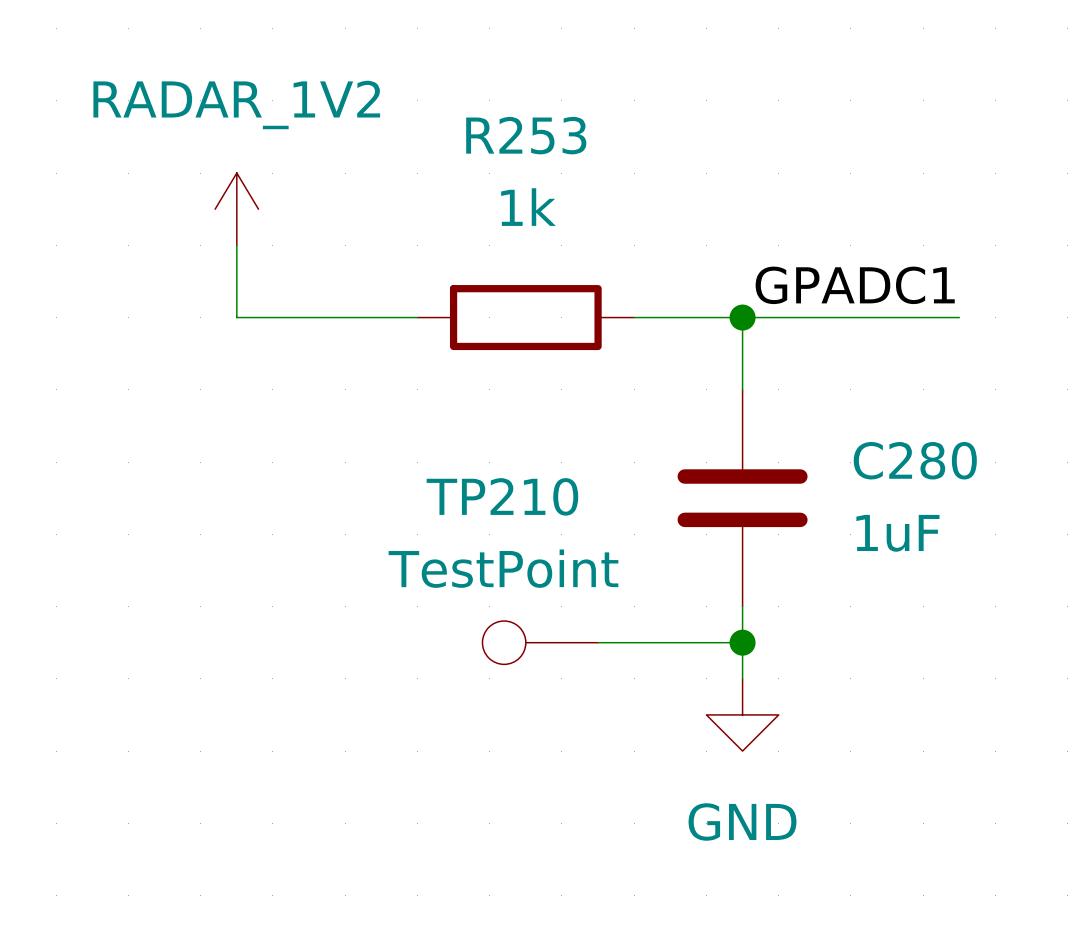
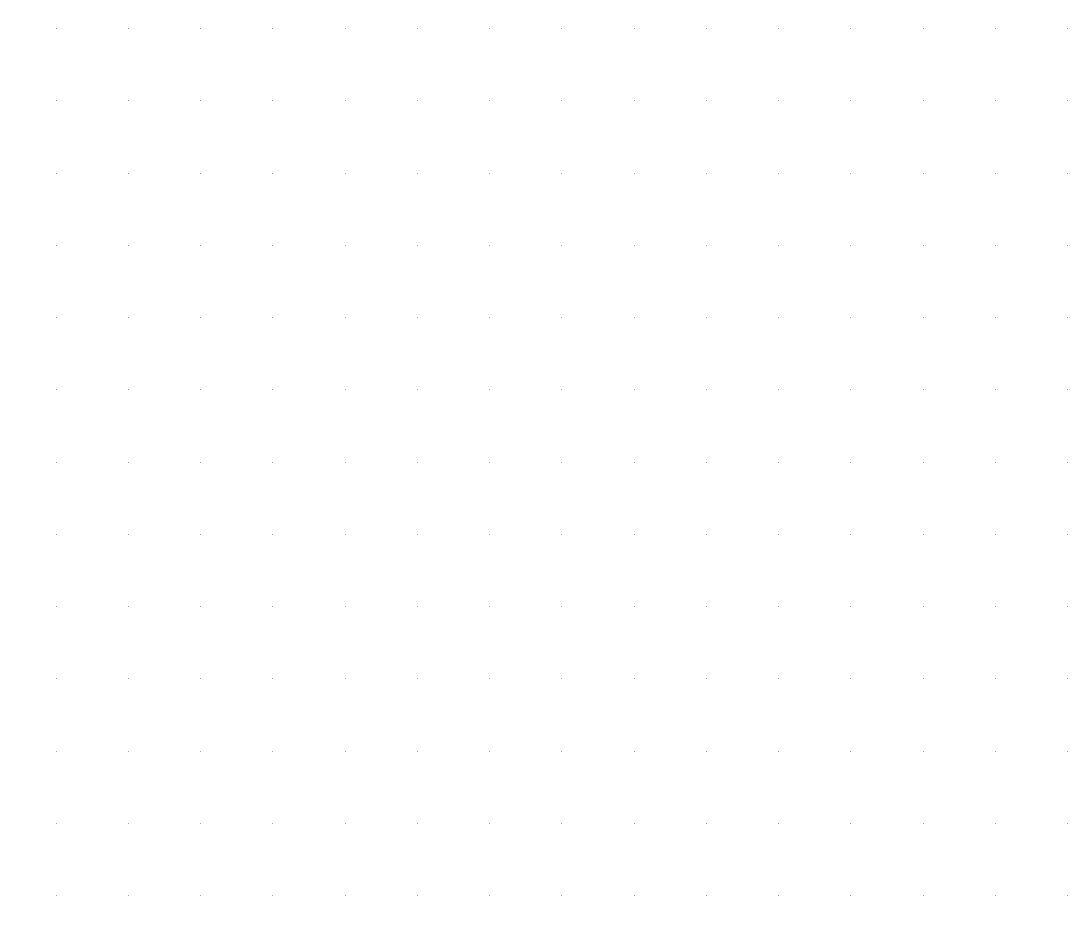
power symbol: RADAR_1V2 (236, 209) -> none
wire: (236, 245) (236, 317) (417, 317) -> none
label: GPADC1 (855, 285) -> none
R253: 1k (525, 317) -> none
wire: (634, 317) (959, 317) -> none
wire: (742, 317) (742, 389) -> none
junction: (742, 317) -> none
C280: 1uF (742, 498) -> none
wire: (742, 606) (742, 678) -> none
TP210: TestPoint (540, 642) -> none
wire: (598, 642) (742, 642) -> none
junction: (742, 642) -> none
power symbol: GND (742, 714) -> none

